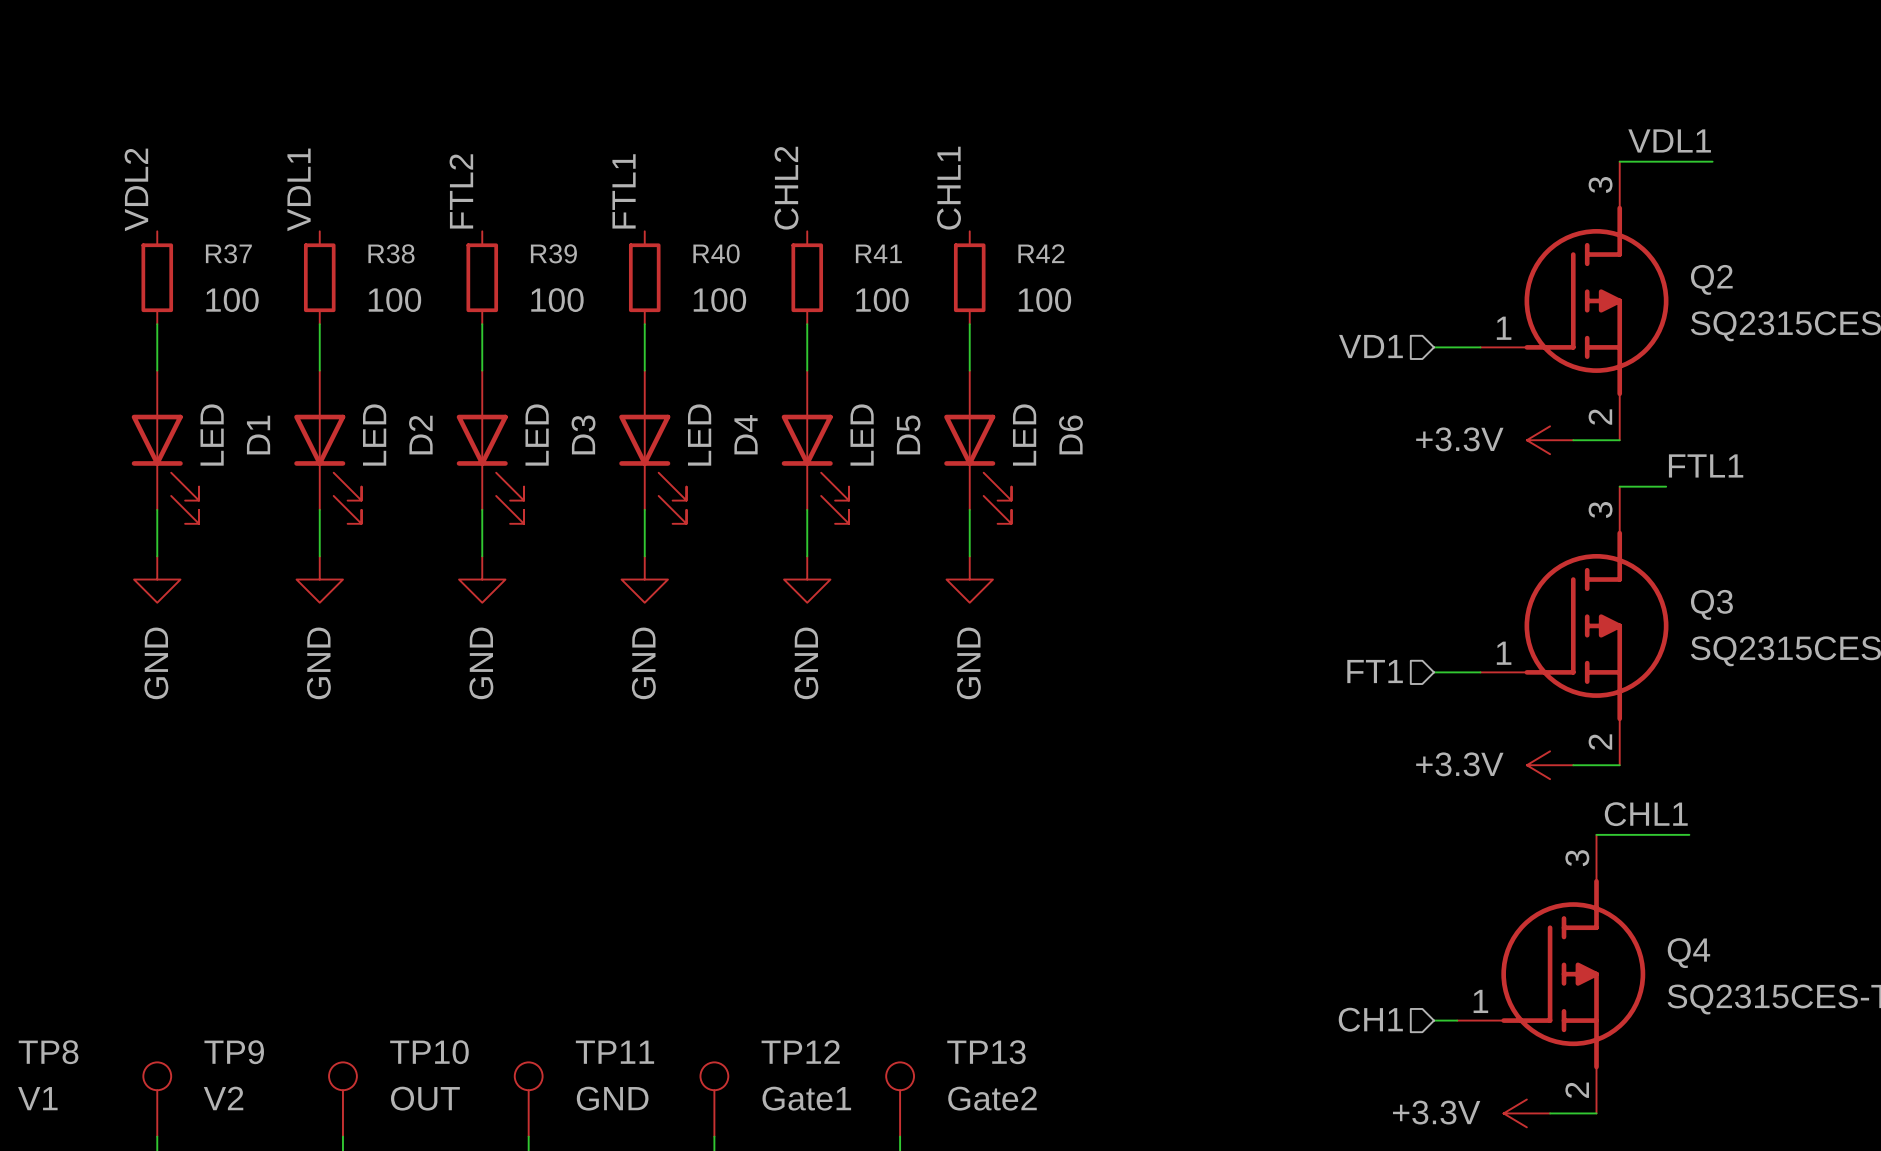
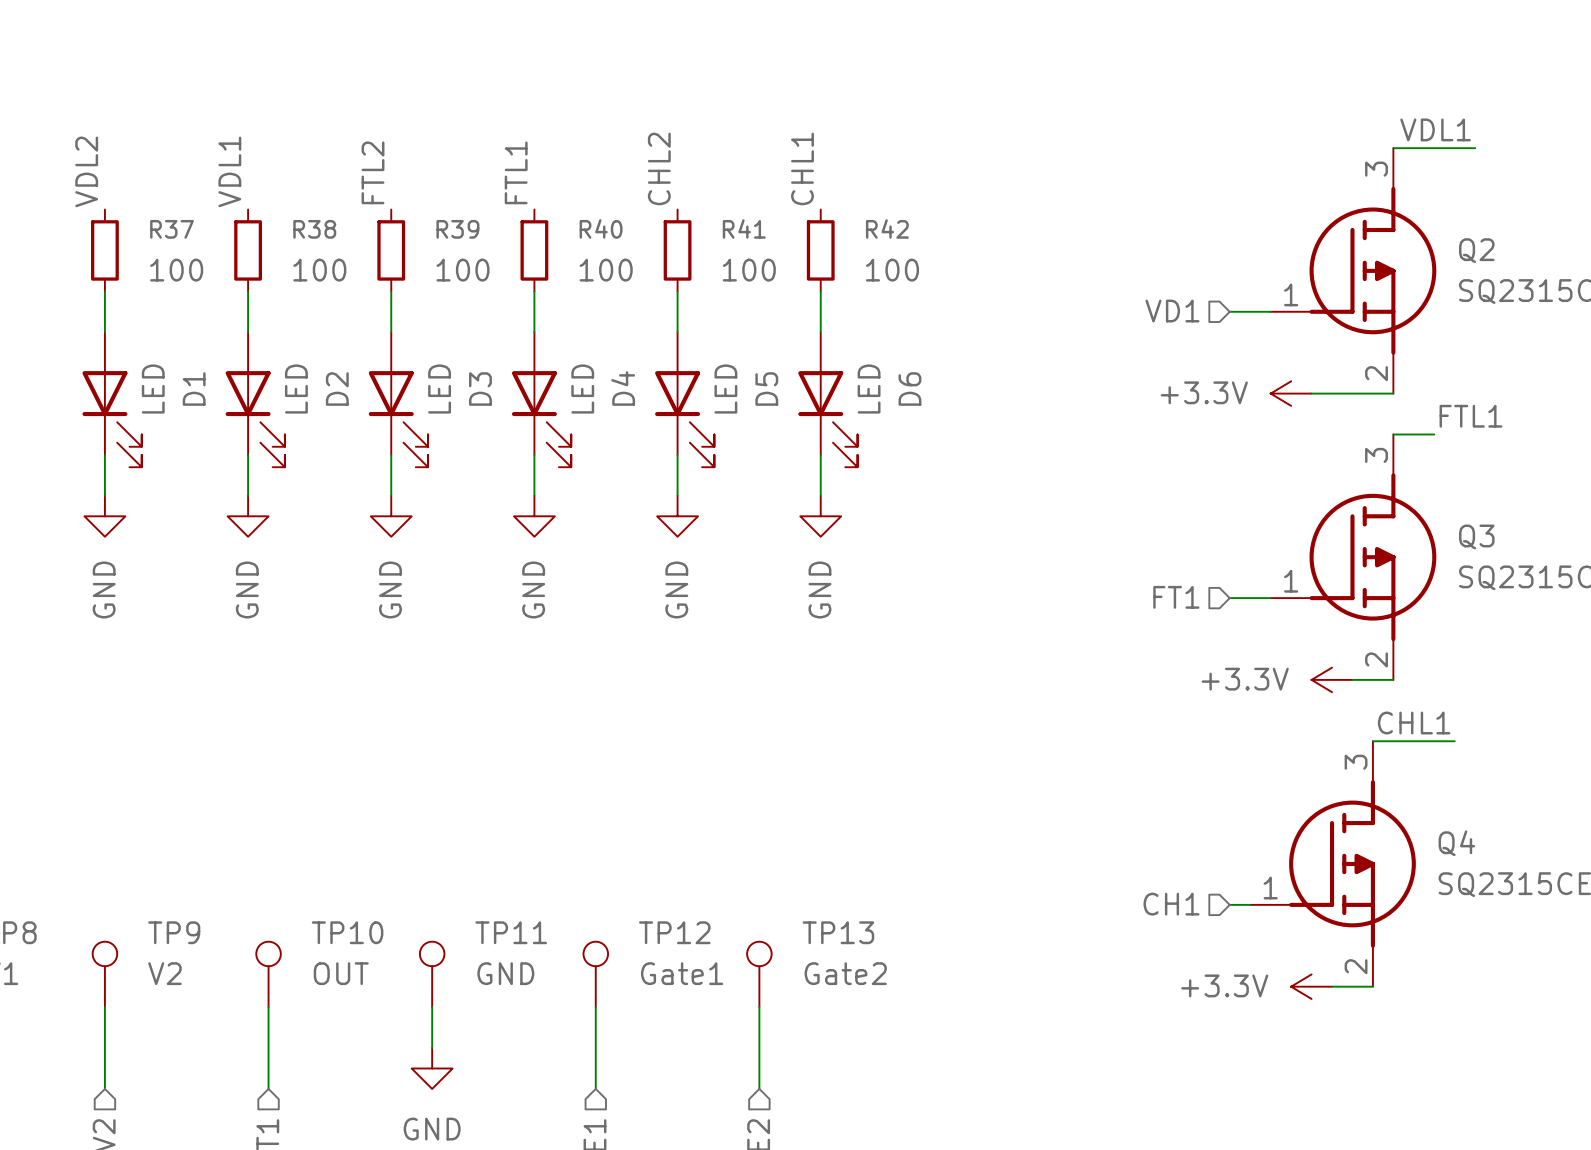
power symbol position: +3.3V (1550, 440) -> +3.3V (1291, 393)

